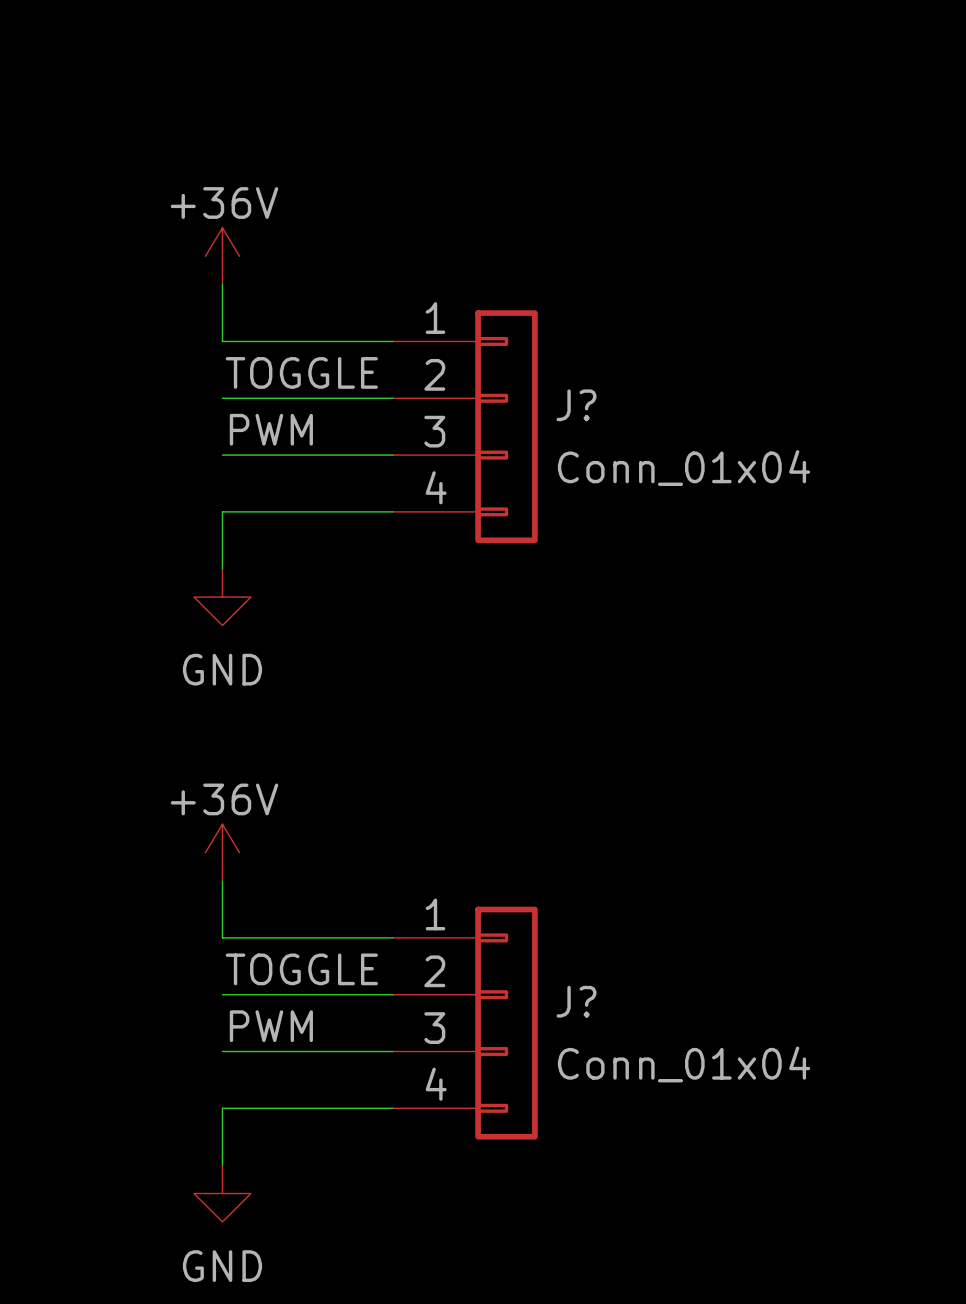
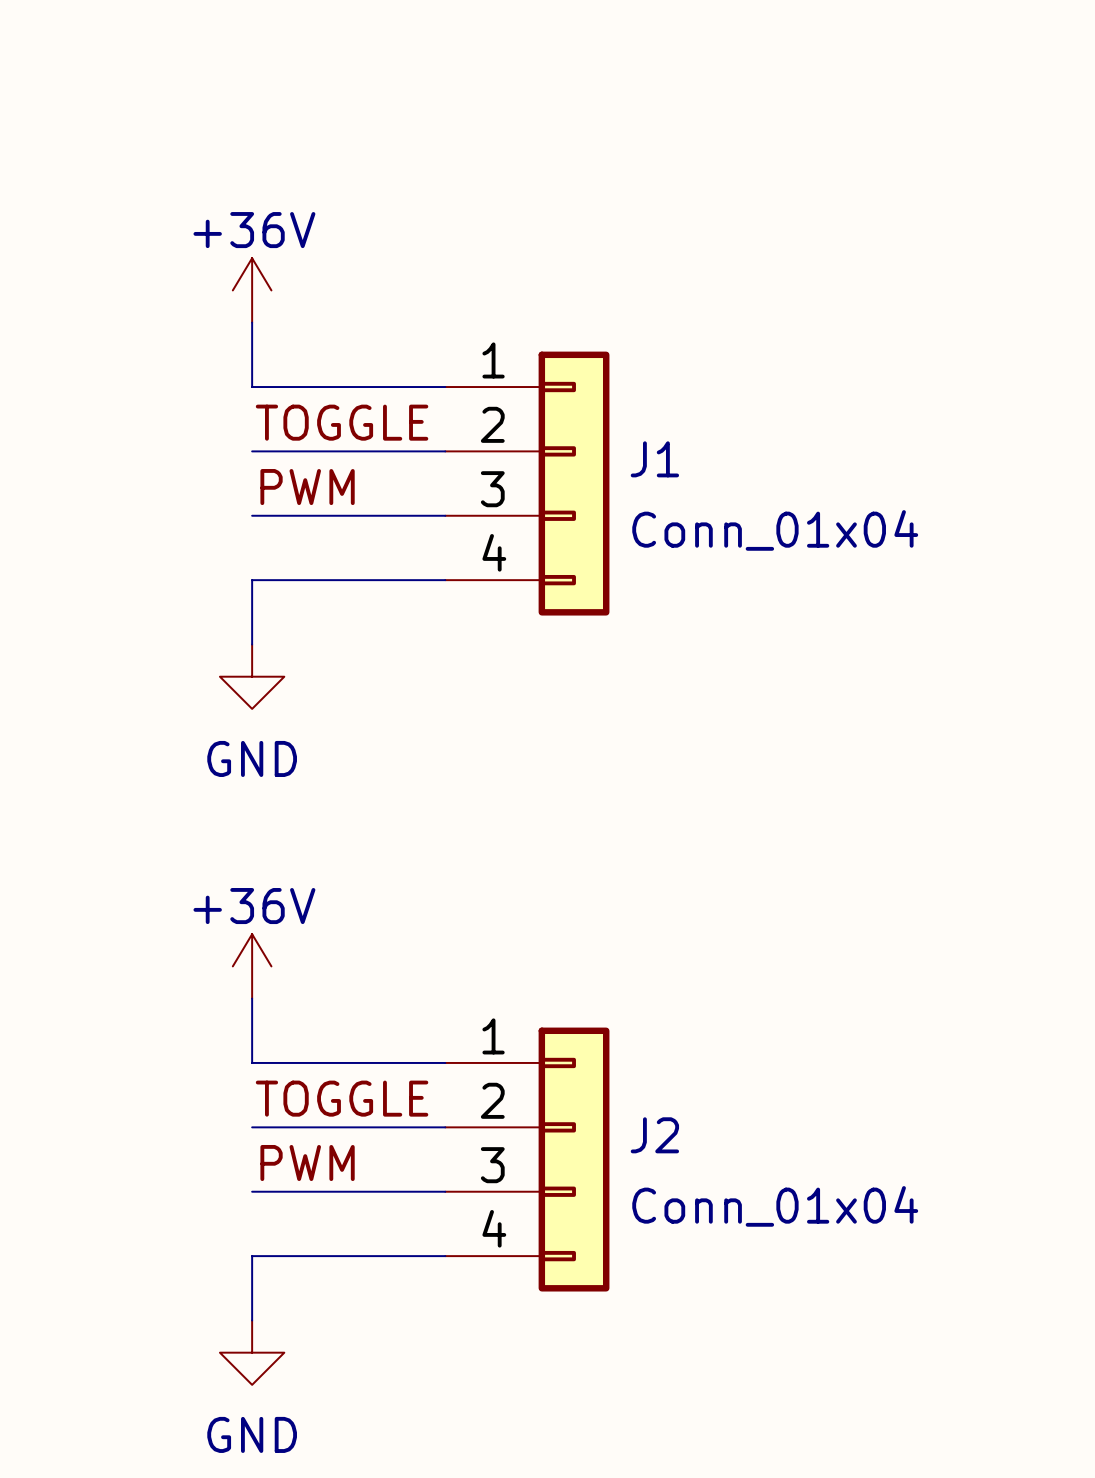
J? name: J? (576, 405) -> J1 (654, 459)
J? name: J? (576, 1001) -> J2 (654, 1135)

